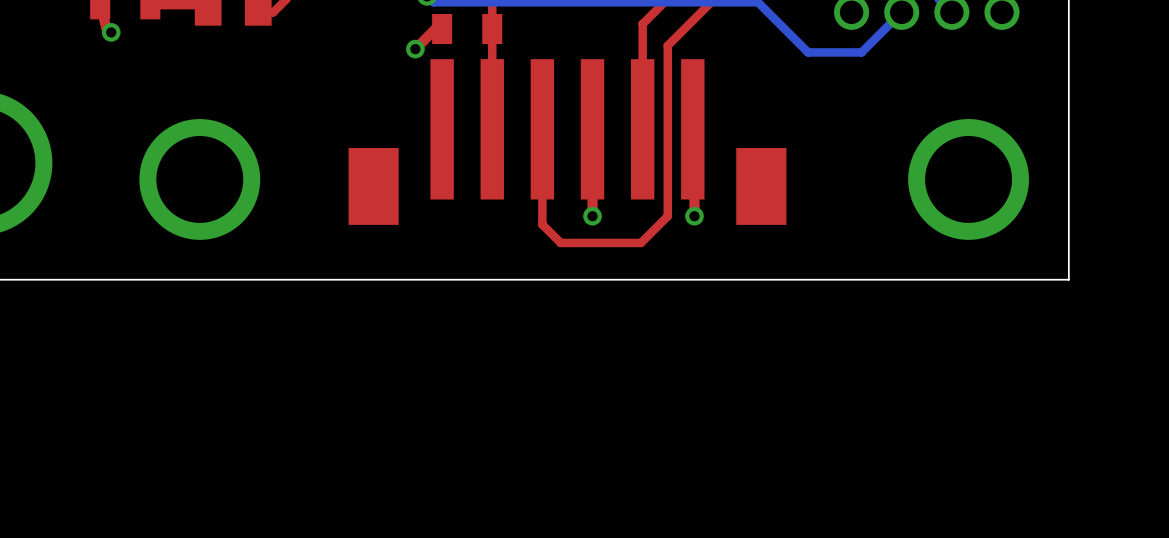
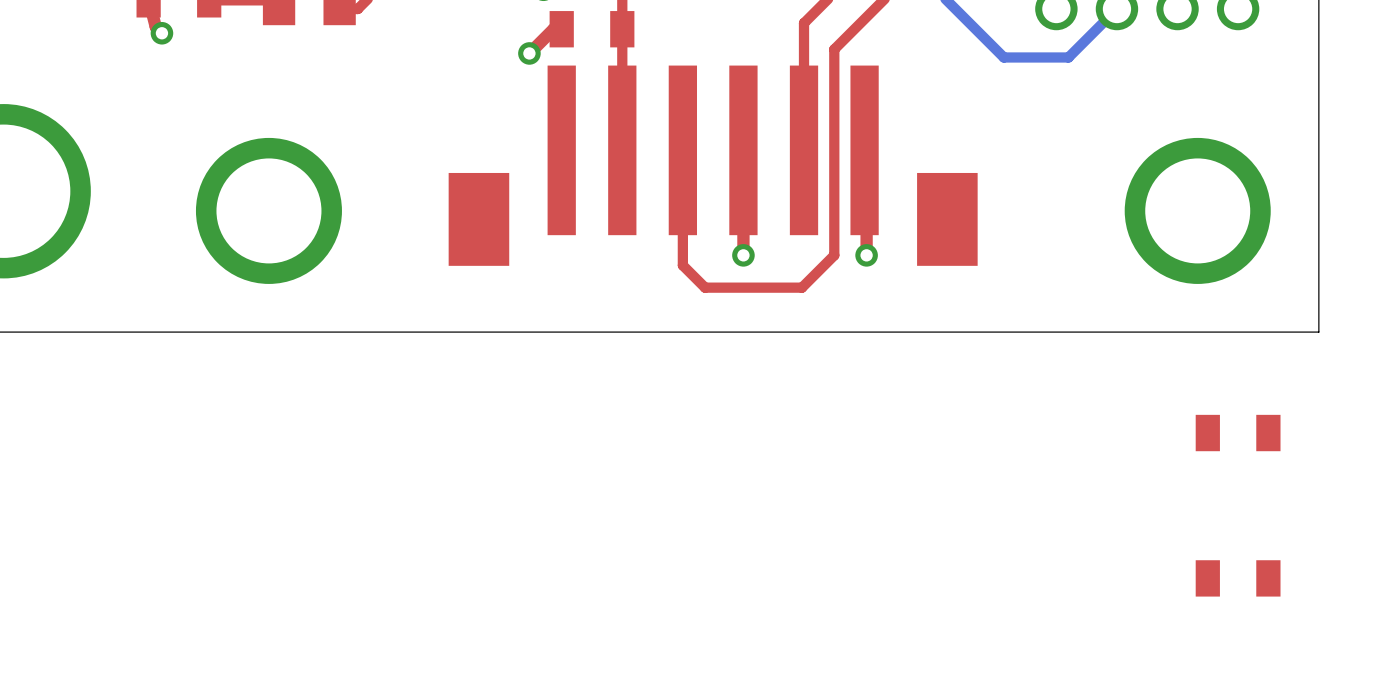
part: none -> (1238, 433)
part: none -> (1238, 578)

